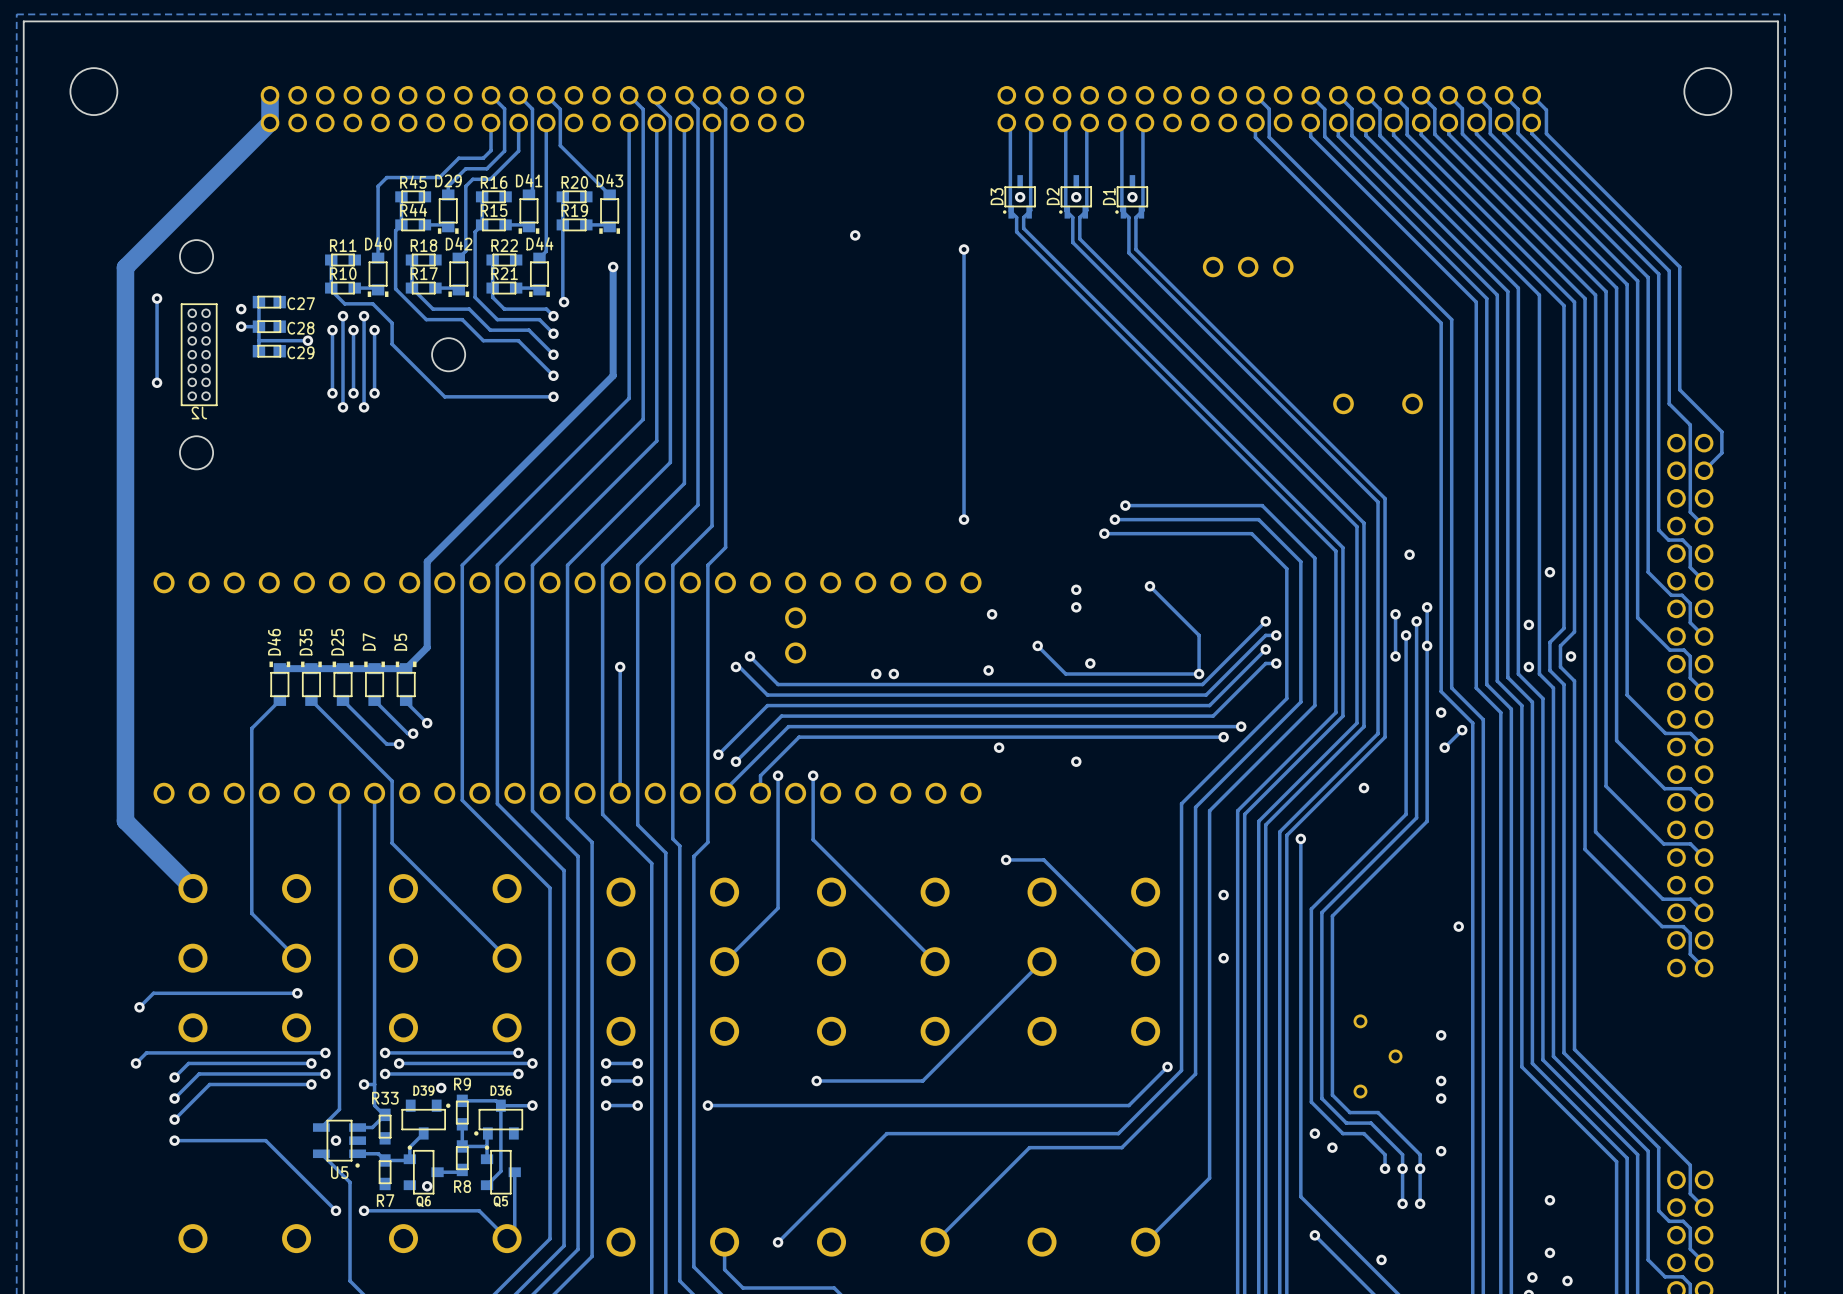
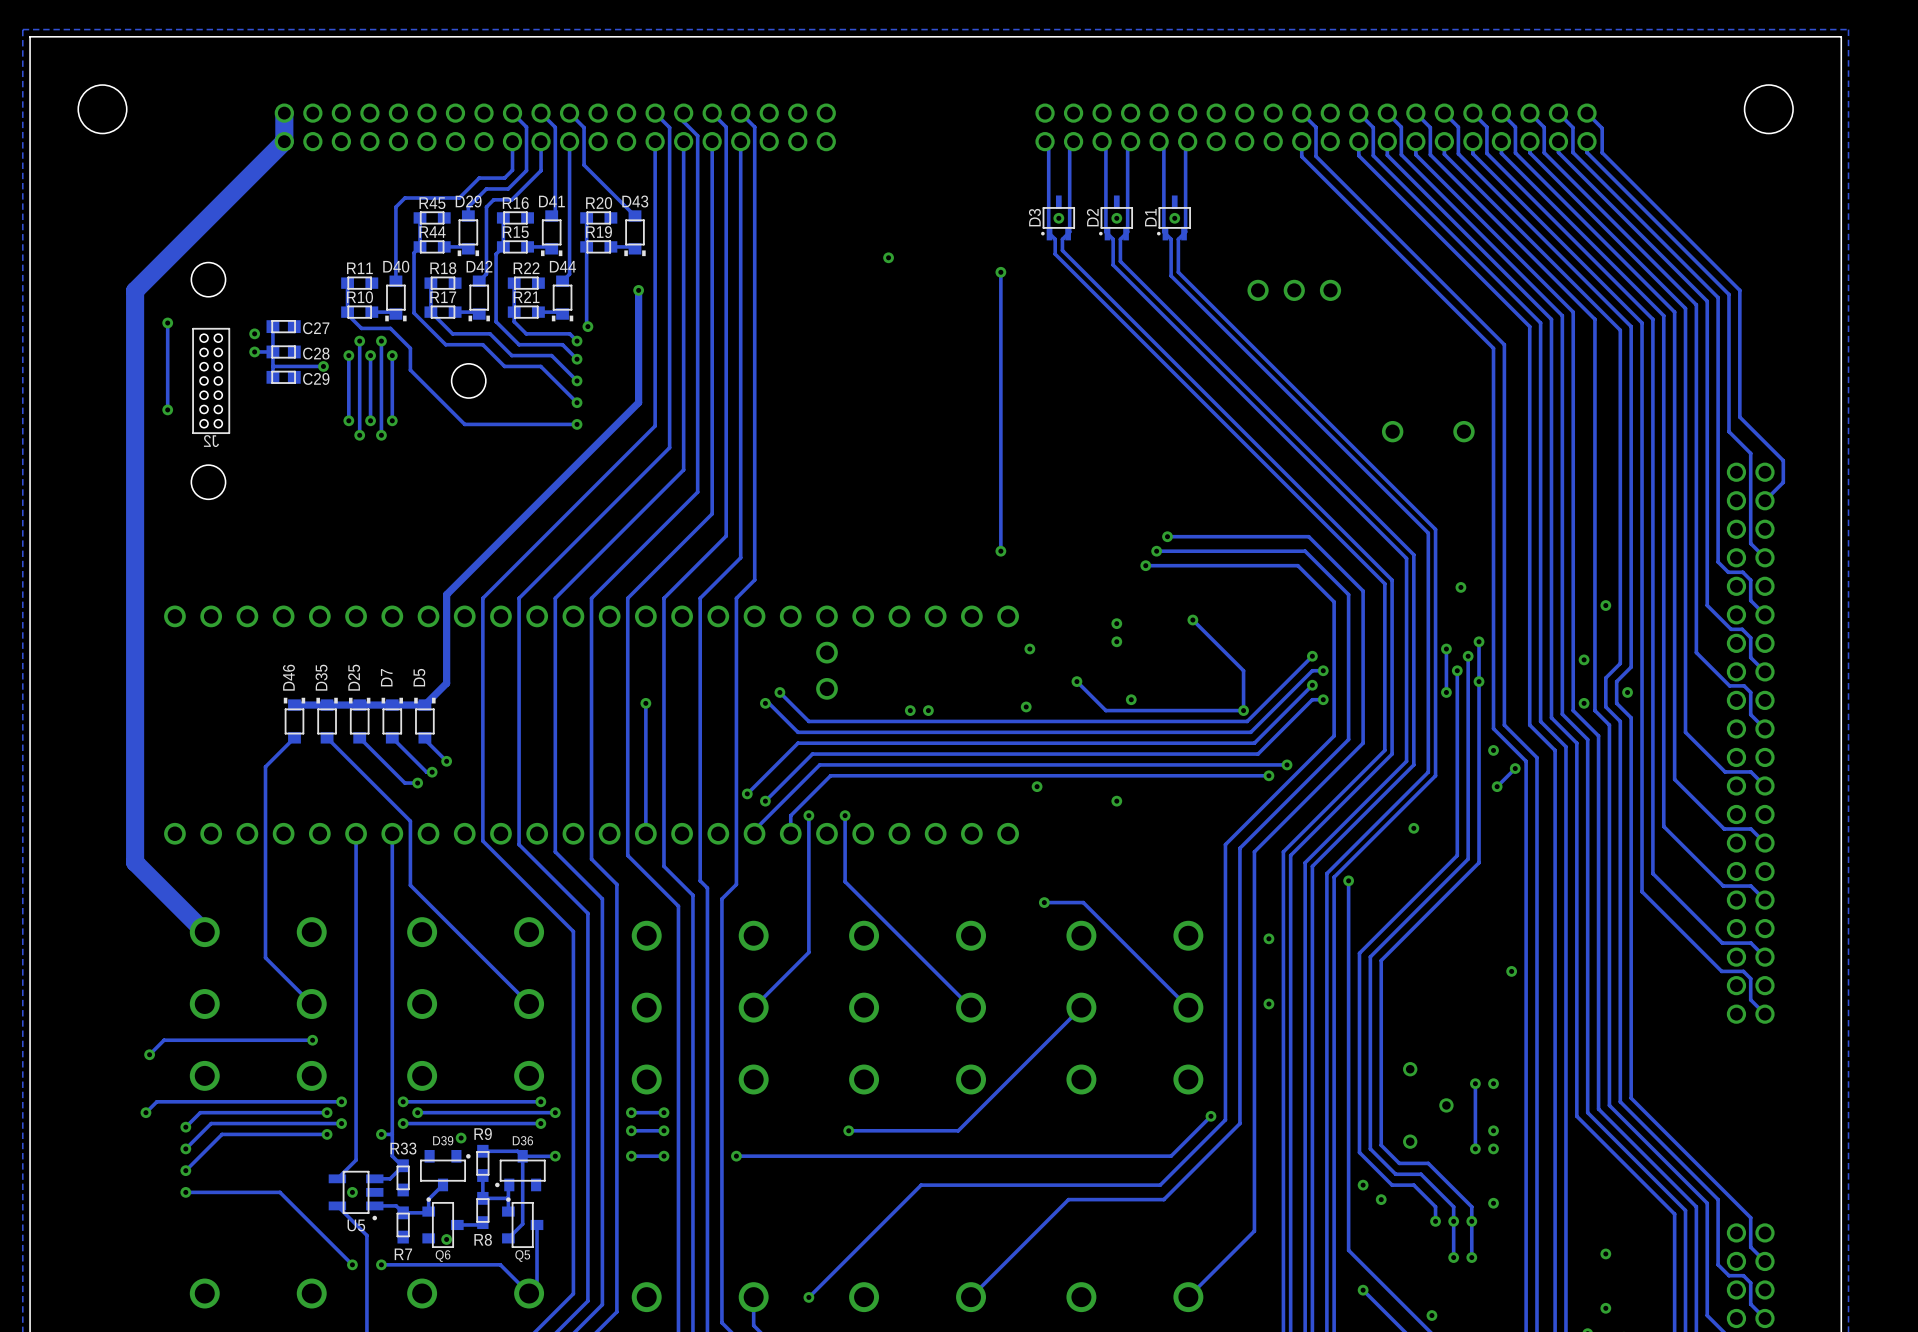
track: none -> (1475, 1083) (1475, 1148)
via: none -> (1475, 1083)
via: none -> (1475, 1148)

